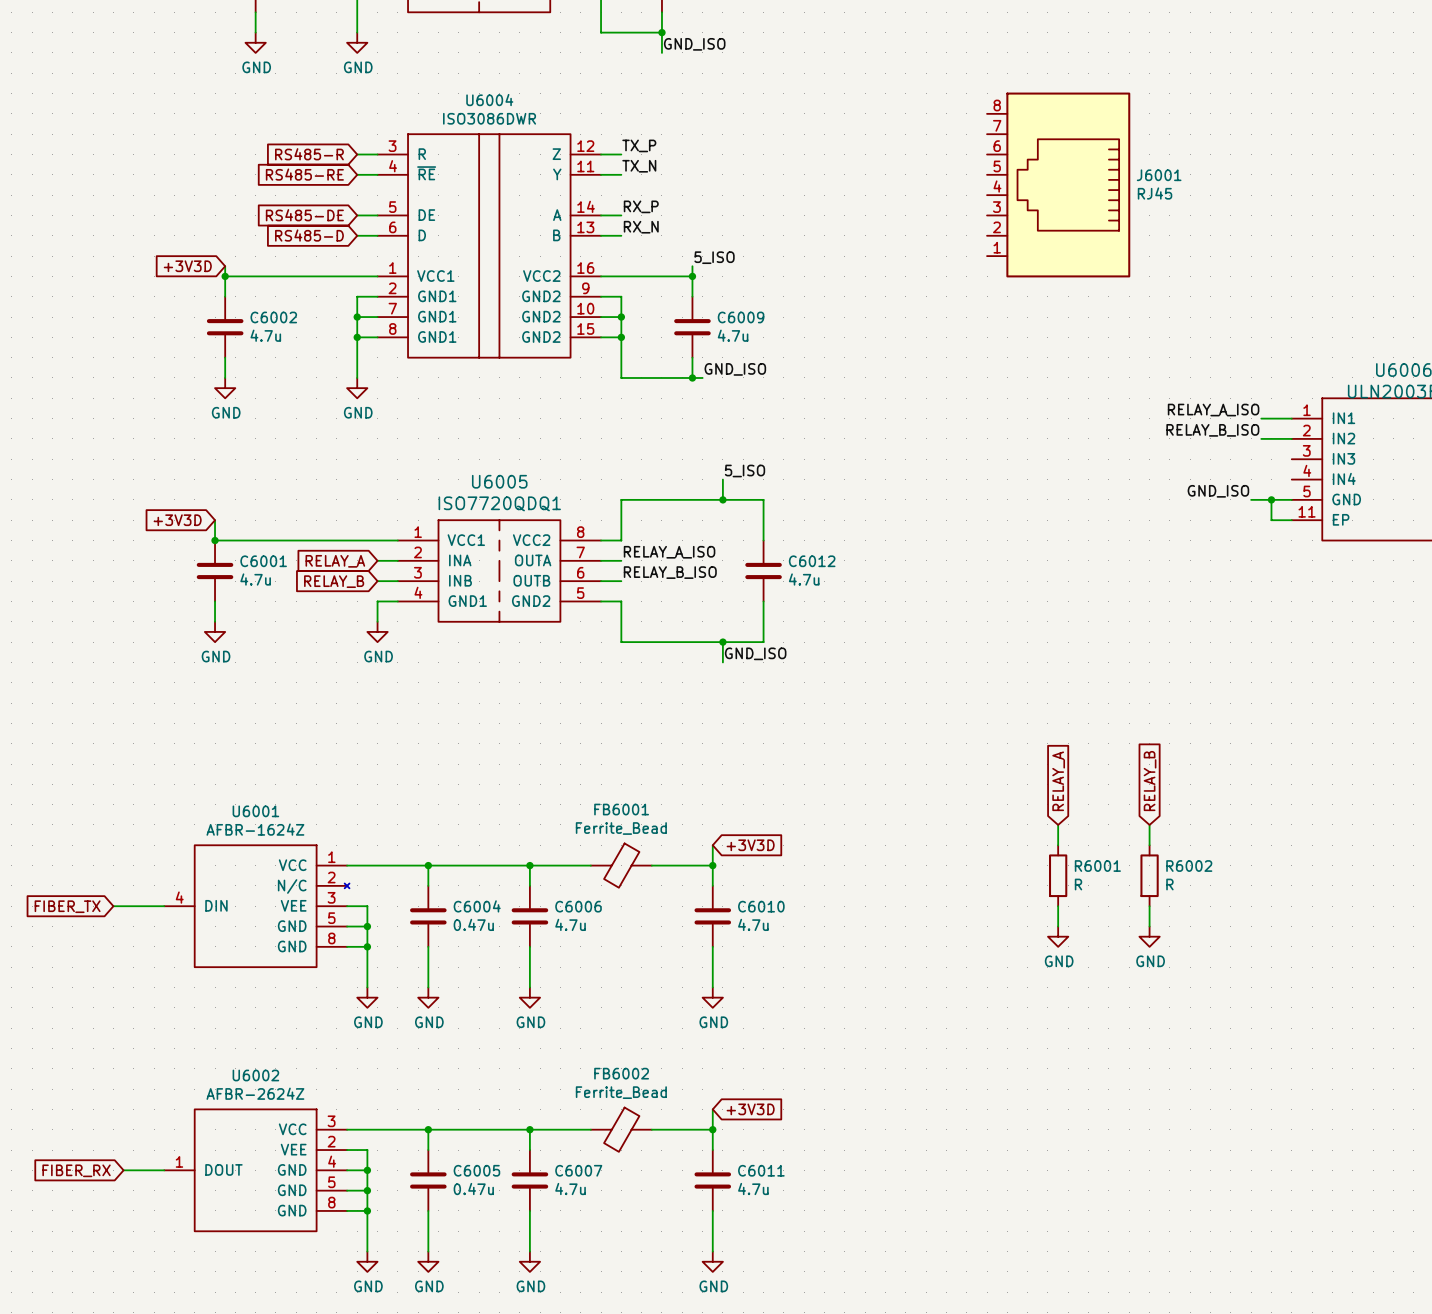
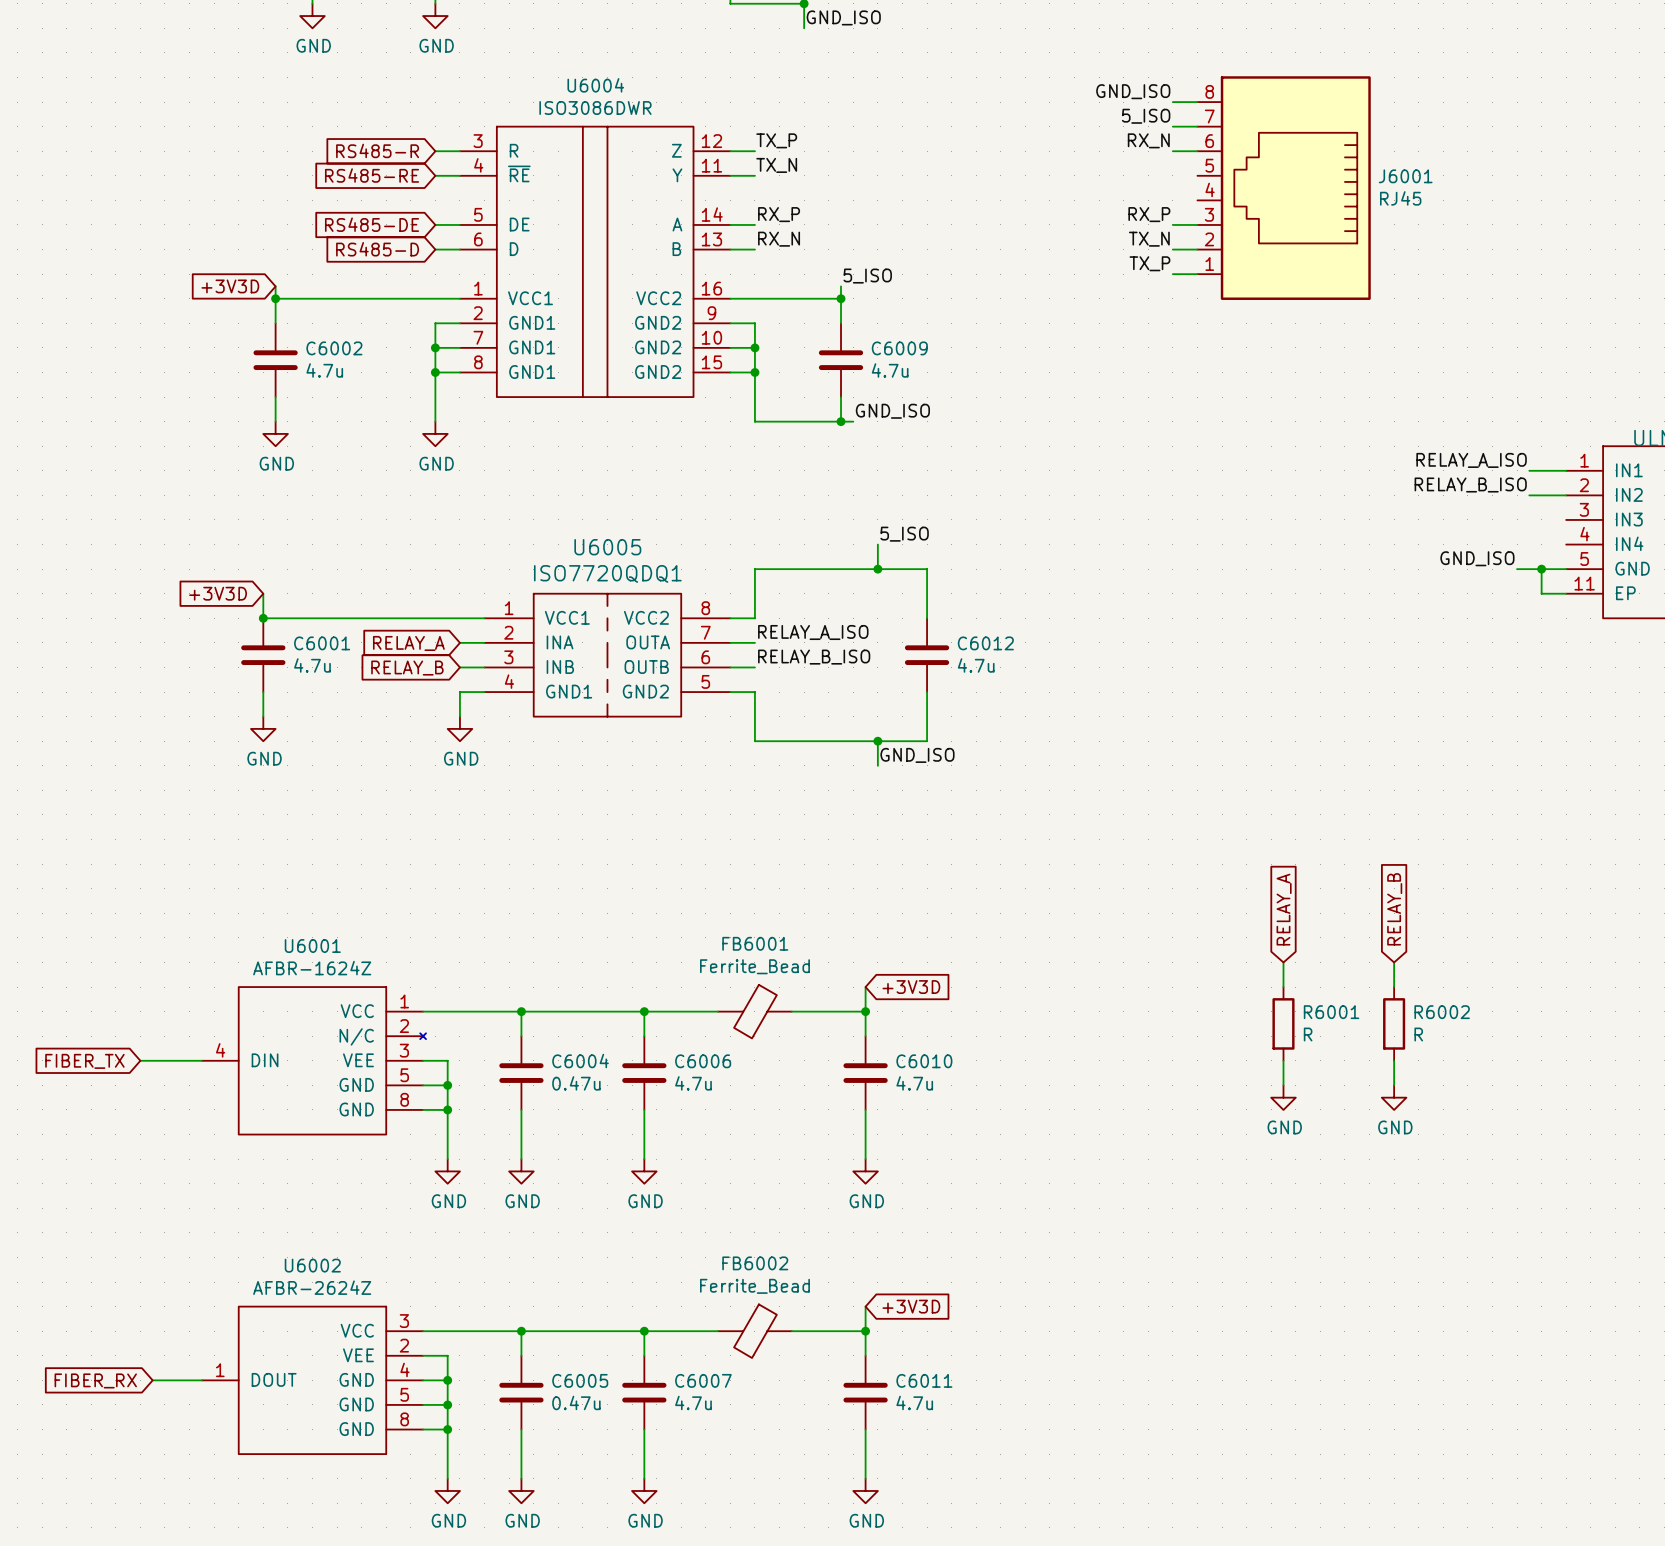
label: none -> GND_ISO (1133, 91)
wire: none -> (1172, 102) (1197, 102)
label: none -> 5_ISO (1146, 116)
wire: none -> (1172, 126) (1197, 126)
label: none -> RX_N (1148, 140)
wire: none -> (1172, 151) (1197, 151)
label: none -> RX_P (1149, 214)
wire: none -> (1172, 224) (1197, 224)
label: none -> TX_N (1149, 239)
wire: none -> (1172, 249) (1197, 249)
label: none -> TX_P (1149, 263)
wire: none -> (1172, 274) (1197, 274)

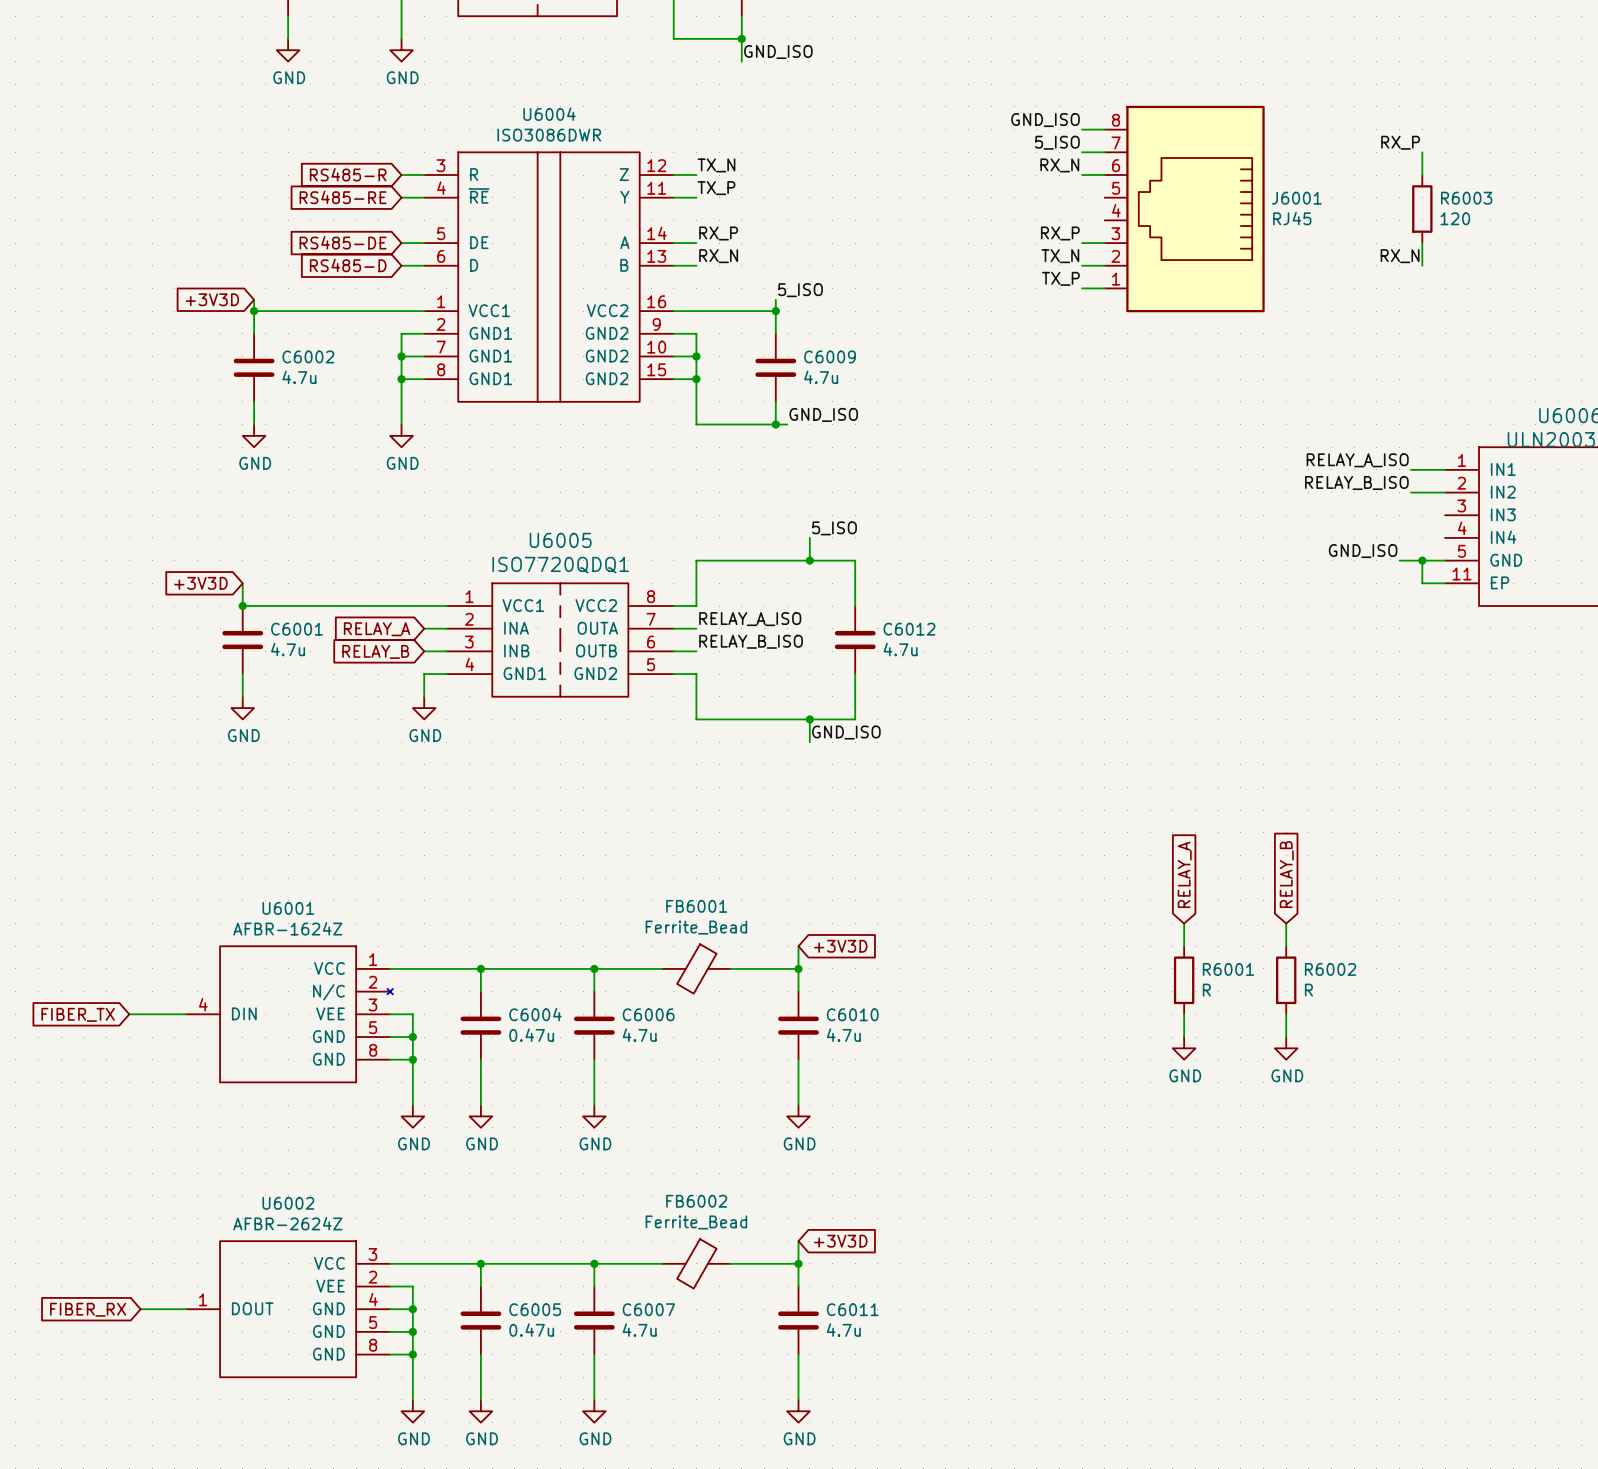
label: none -> RX_P (1400, 142)
wire: none -> (1422, 152) (1422, 175)
label: TX_P (776, 140) -> TX_N (716, 165)
label: TX_N (776, 165) -> TX_P (716, 188)
R6003: none -> 120 (1422, 209)
wire: none -> (1422, 243) (1422, 265)
label: none -> RX_N (1400, 256)

